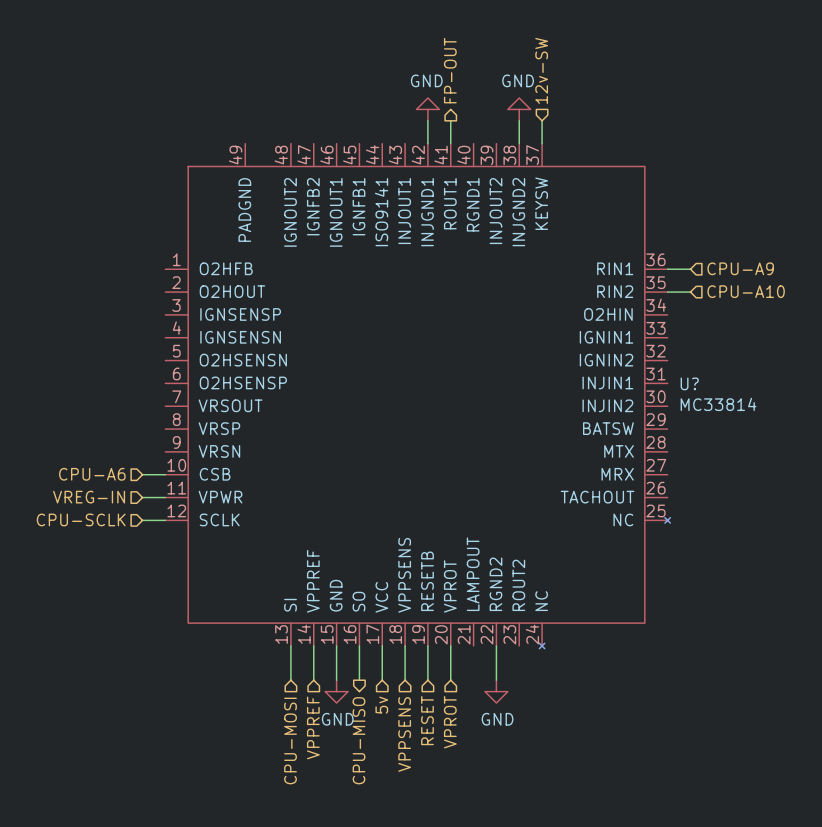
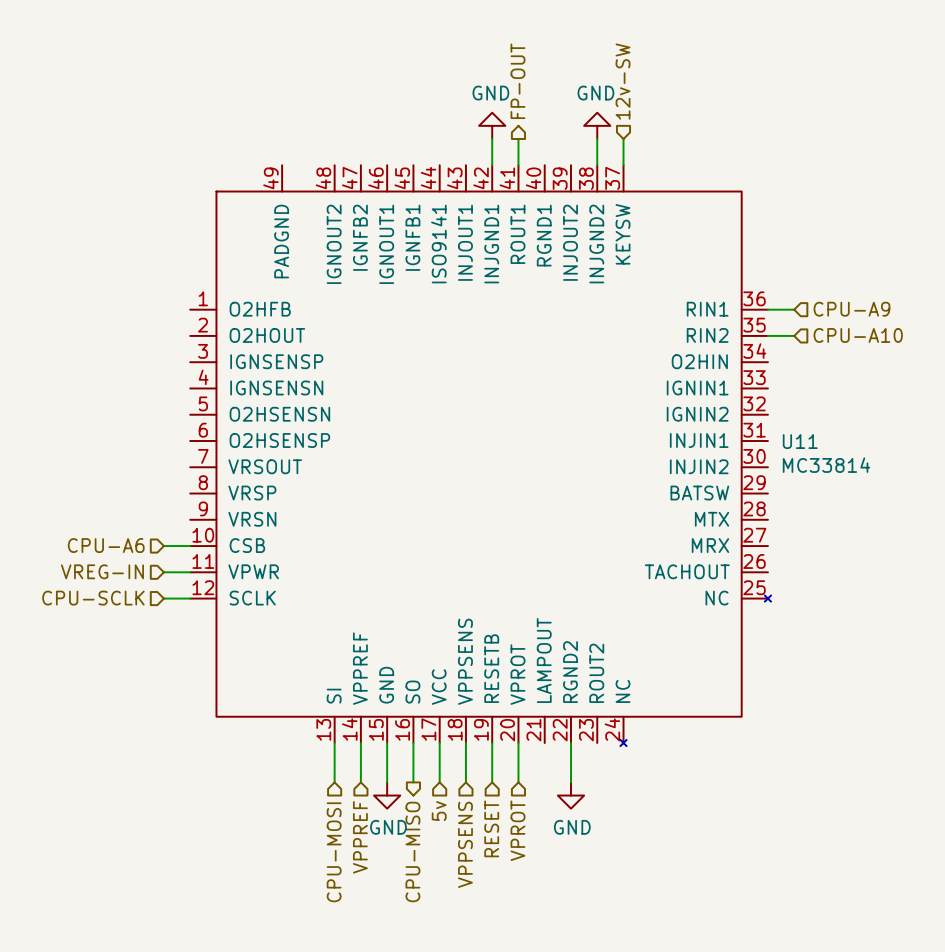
U? name: U? (689, 383) -> U11 (800, 441)

